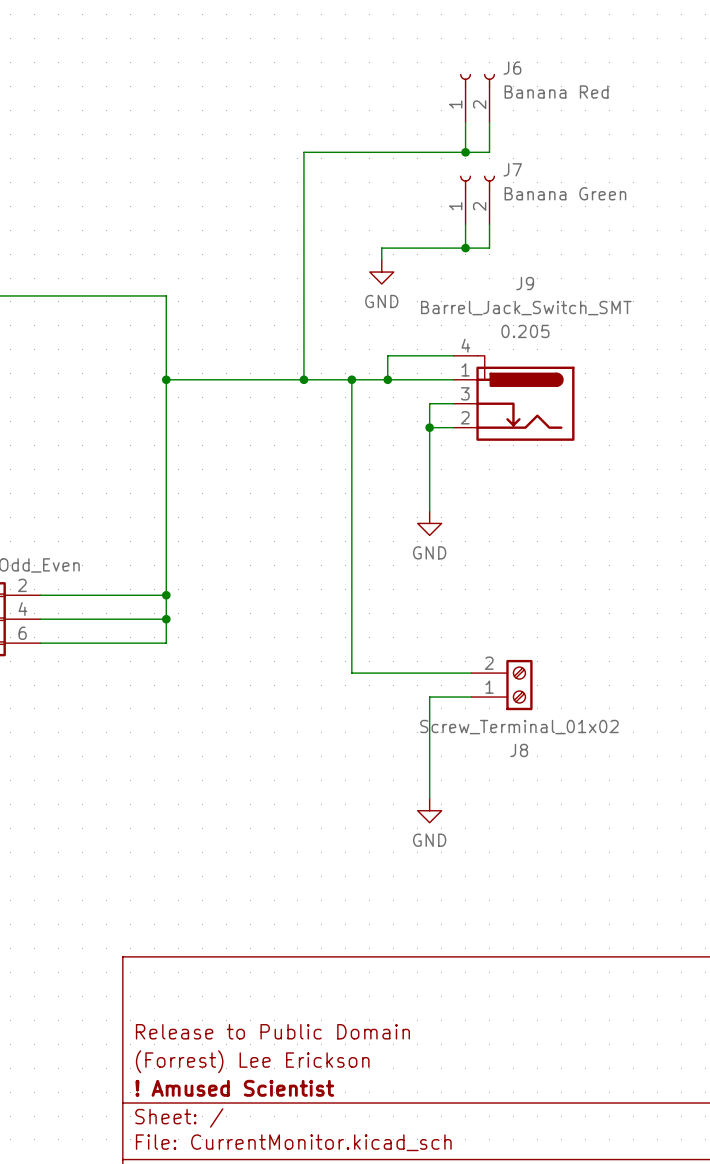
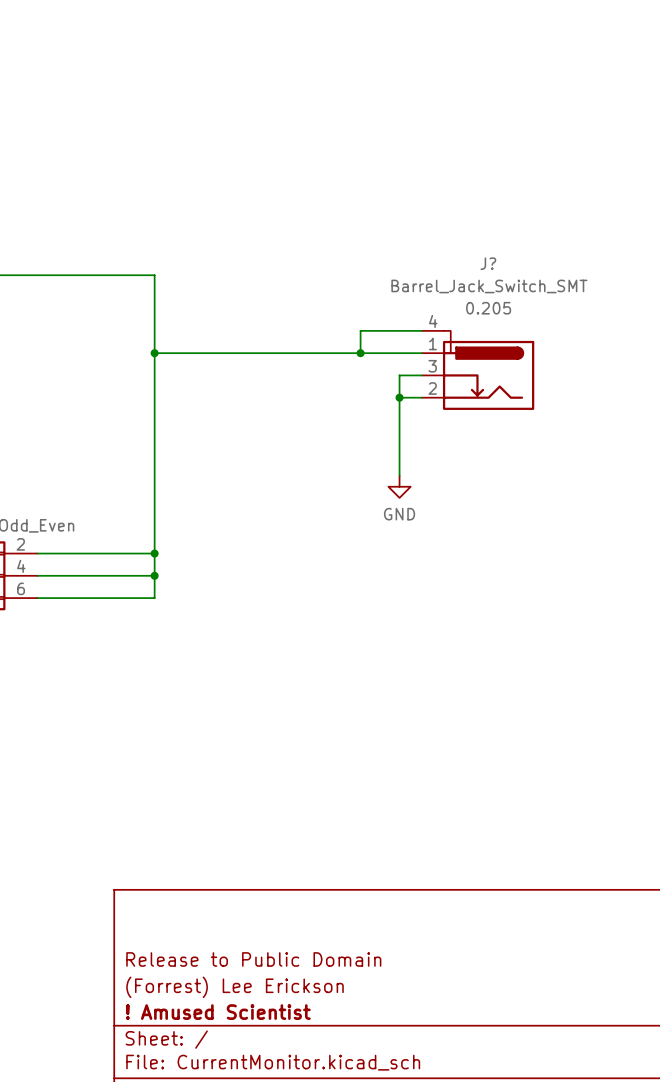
J6: Banana Red (477, 98) -> none
wire: (465, 122) (465, 152) -> none
wire: (489, 122) (489, 152) (303, 152) (303, 379) -> none
junction: (465, 152) -> none
J7: Banana Green (477, 199) -> none
wire: (465, 224) (465, 248) -> none
wire: (489, 224) (489, 248) (381, 248) (381, 260) -> none
junction: (465, 248) -> none
power symbol: GND (381, 272) -> none
J9 name: J9 (525, 283) -> J? (488, 263)
junction: (303, 379) -> none
wire: (351, 379) (351, 673) (471, 673) -> none
junction: (351, 379) -> none
J8: Screw_Terminal_01x02 (502, 685) -> none
wire: (471, 697) (429, 697) (429, 798) -> none
power symbol: GND (429, 810) -> none

